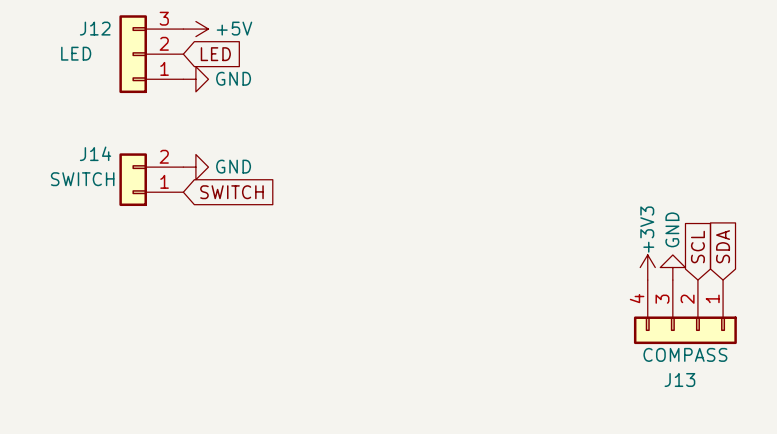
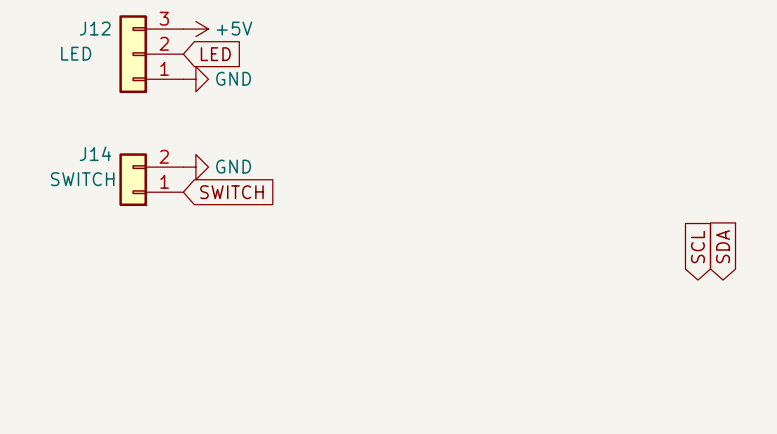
power symbol: +3V3 (647, 267) -> none
power symbol: GND (672, 267) -> none
J13: COMPASS (685, 312) -> none

